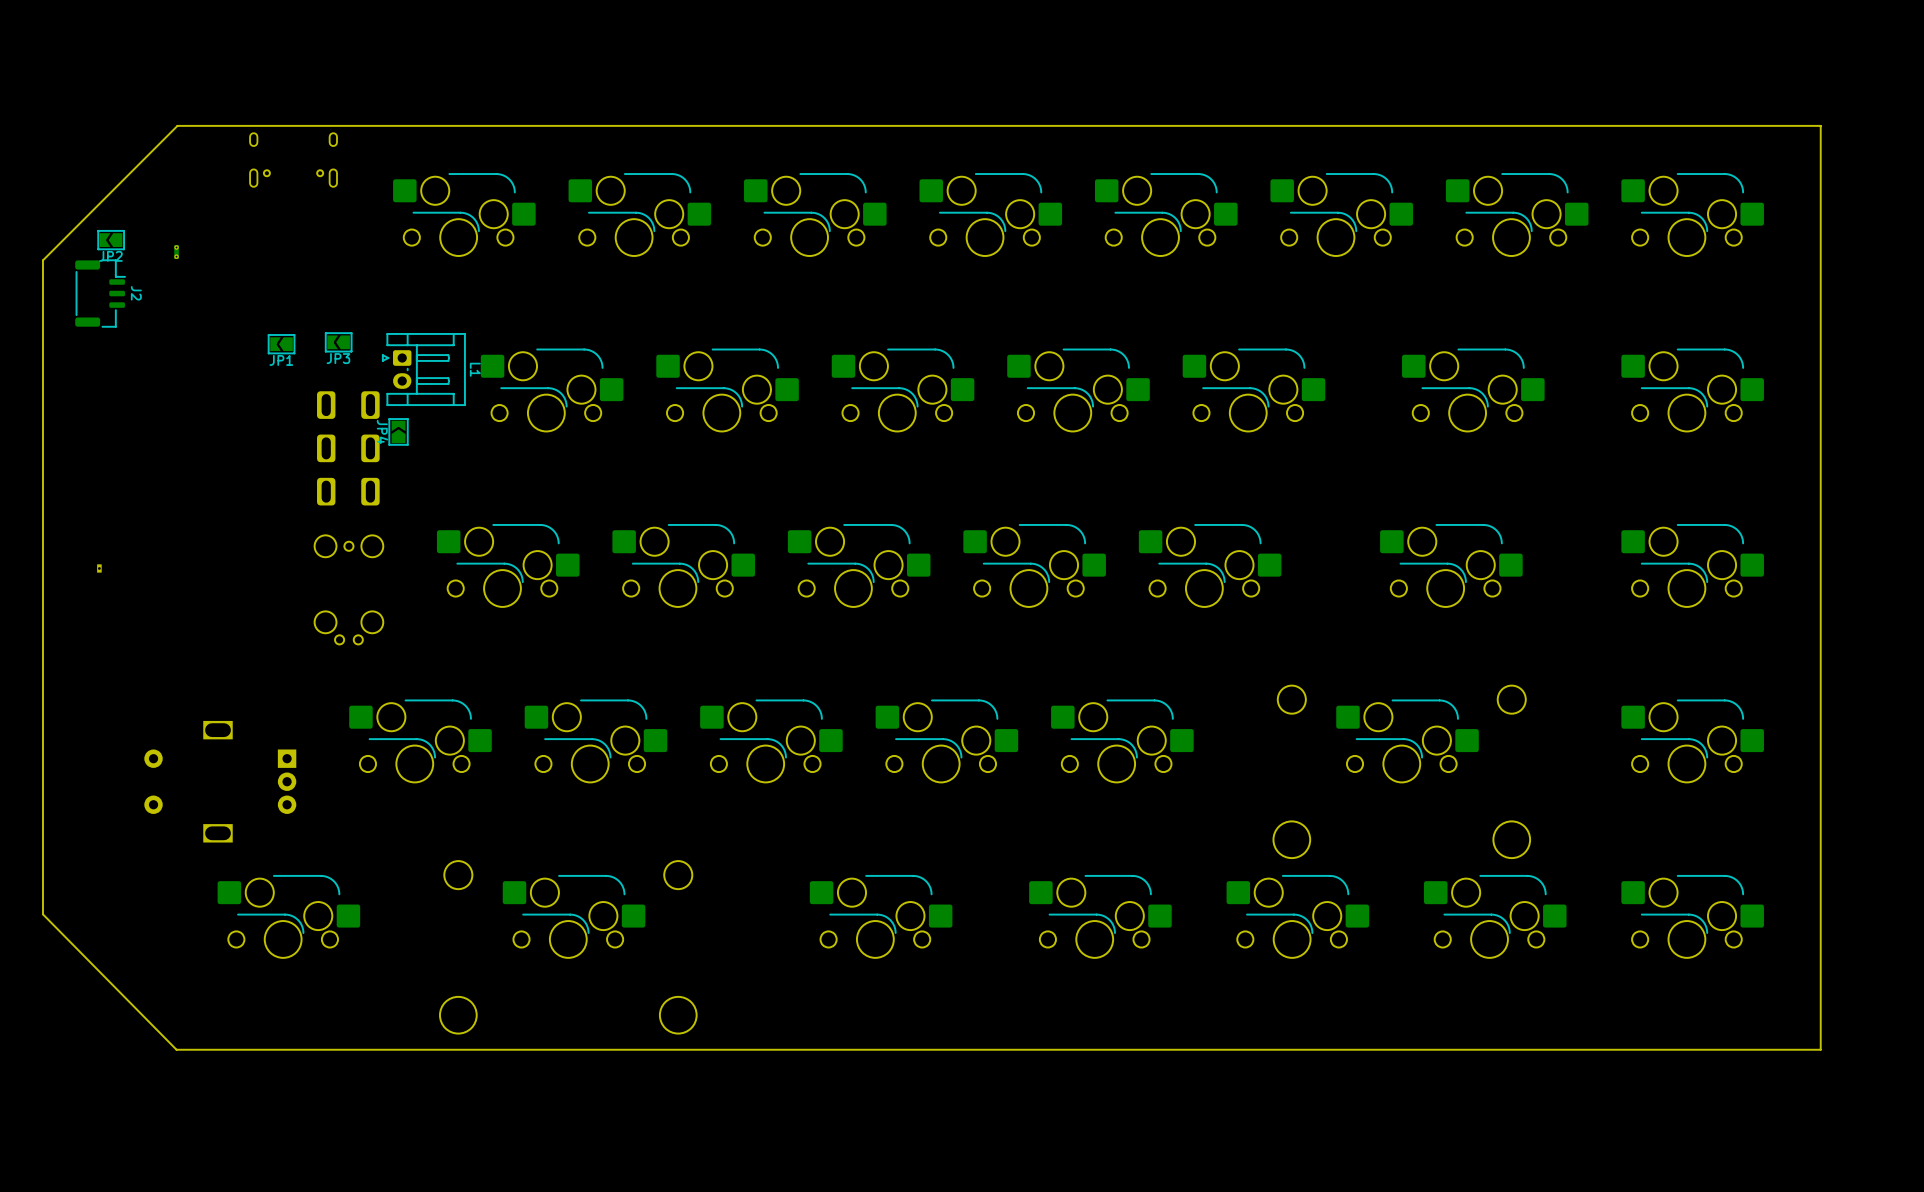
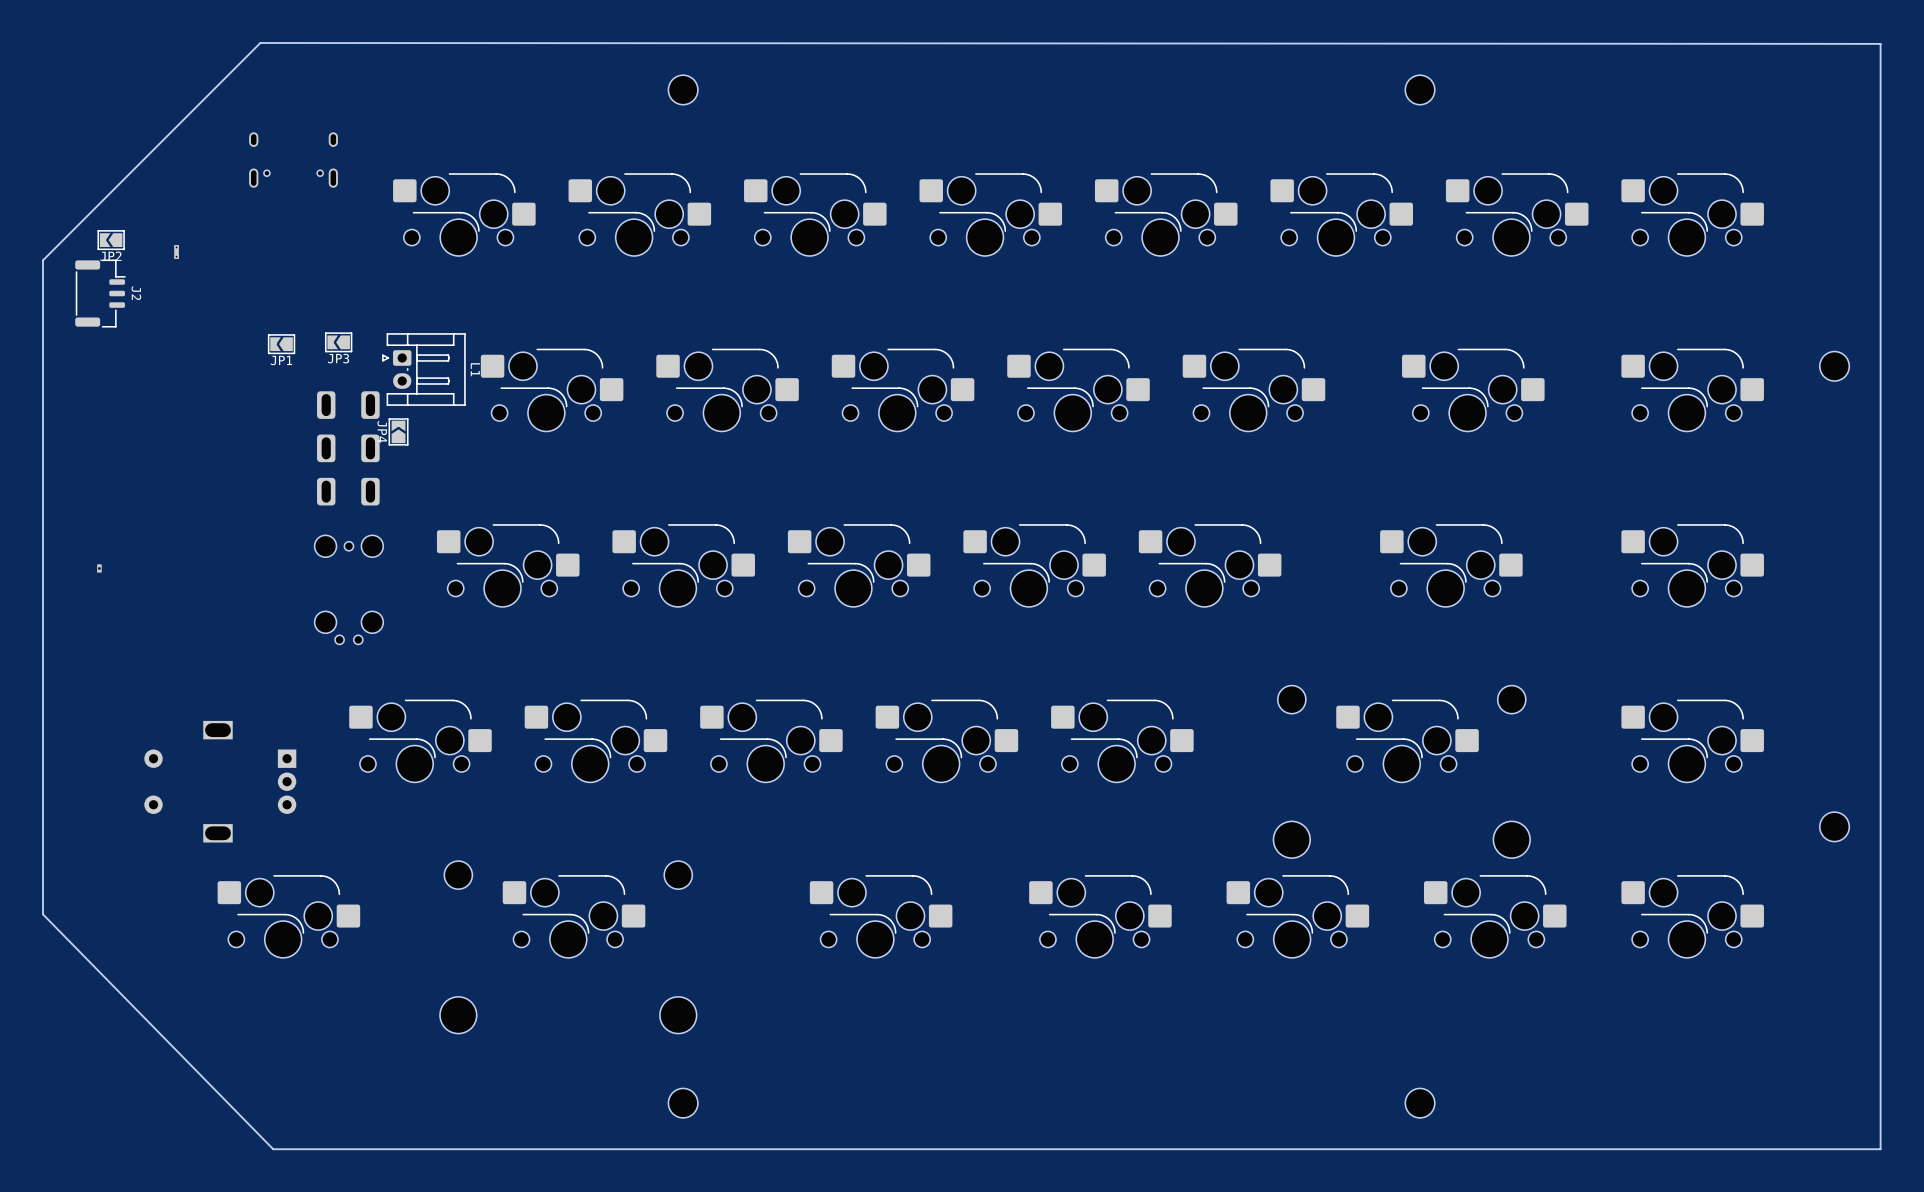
part: none -> (683, 89)
part: none -> (1420, 89)
board edge: (177, 125) (1820, 125) (1820, 1049) (176, 1049) (42, 914) -> (177, 125) (260, 42) (1880, 43) (1880, 1149) (273, 1149) (42, 914)
part: none -> (1834, 366)
part: none -> (1834, 826)
part: none -> (683, 1103)
part: none -> (1420, 1103)

